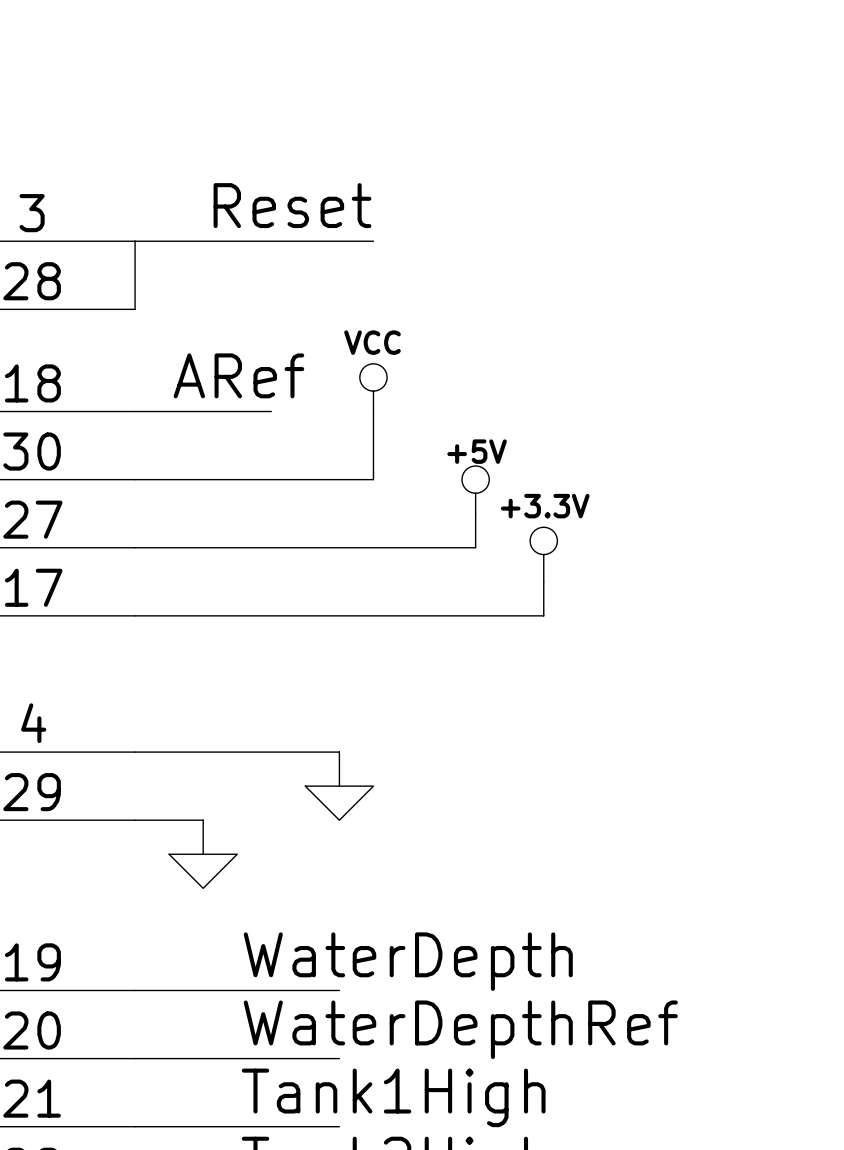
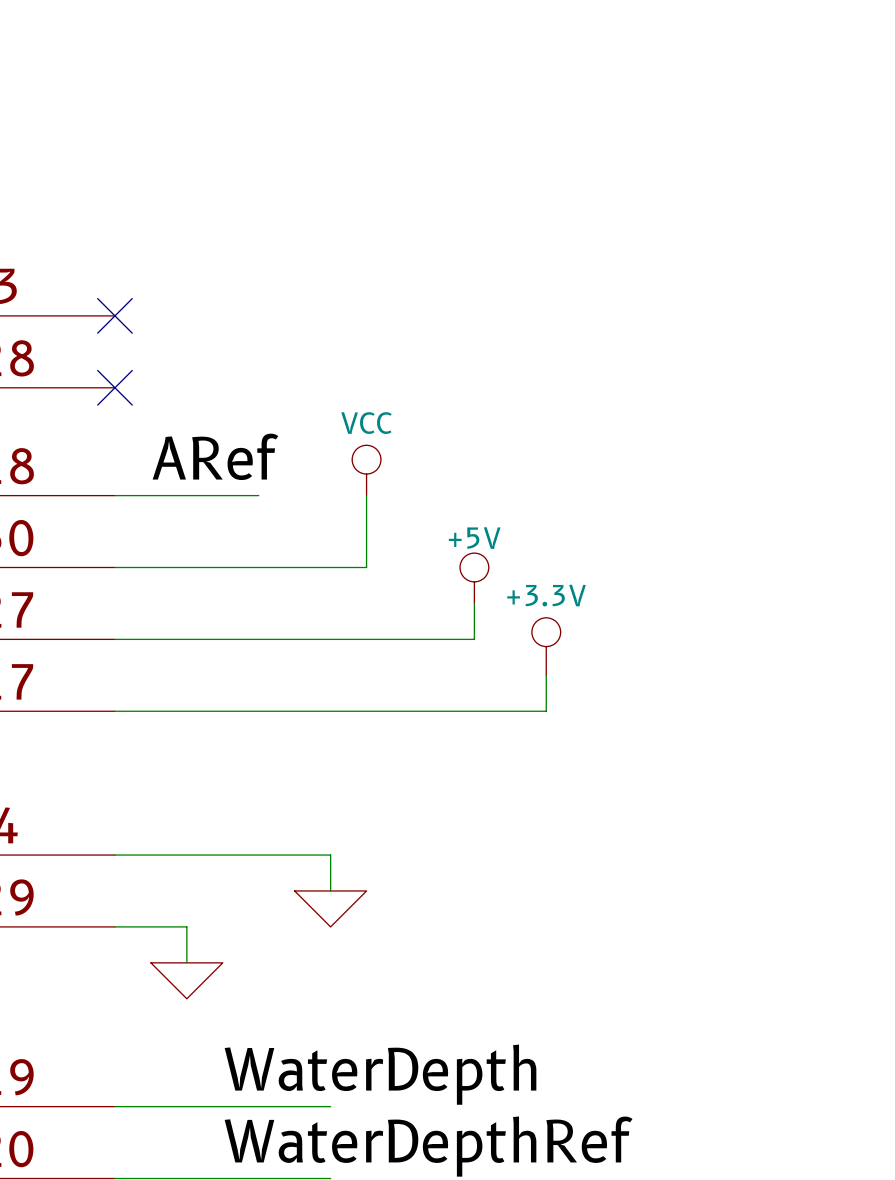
label: Reset (292, 205) -> none
no-connect mark: none -> (114, 315)
wire: (373, 241) (135, 241) (135, 309) -> none
no-connect mark: none -> (114, 387)

